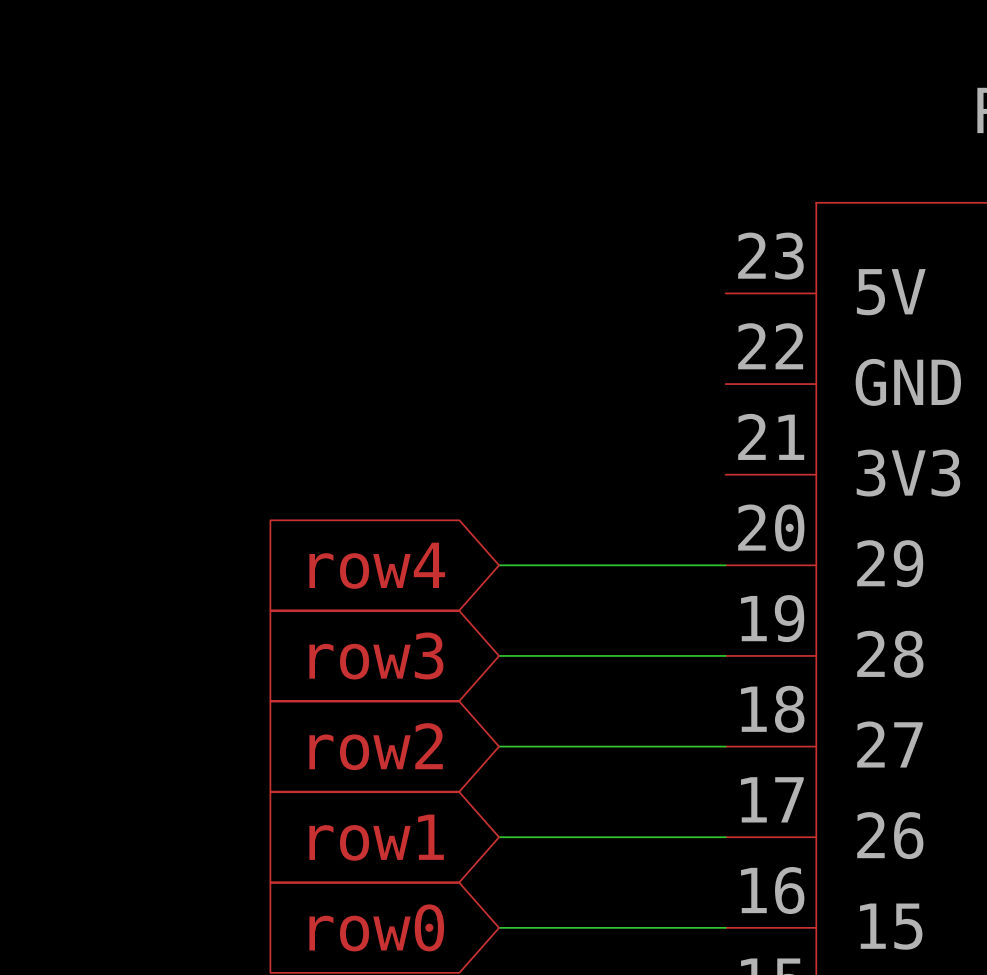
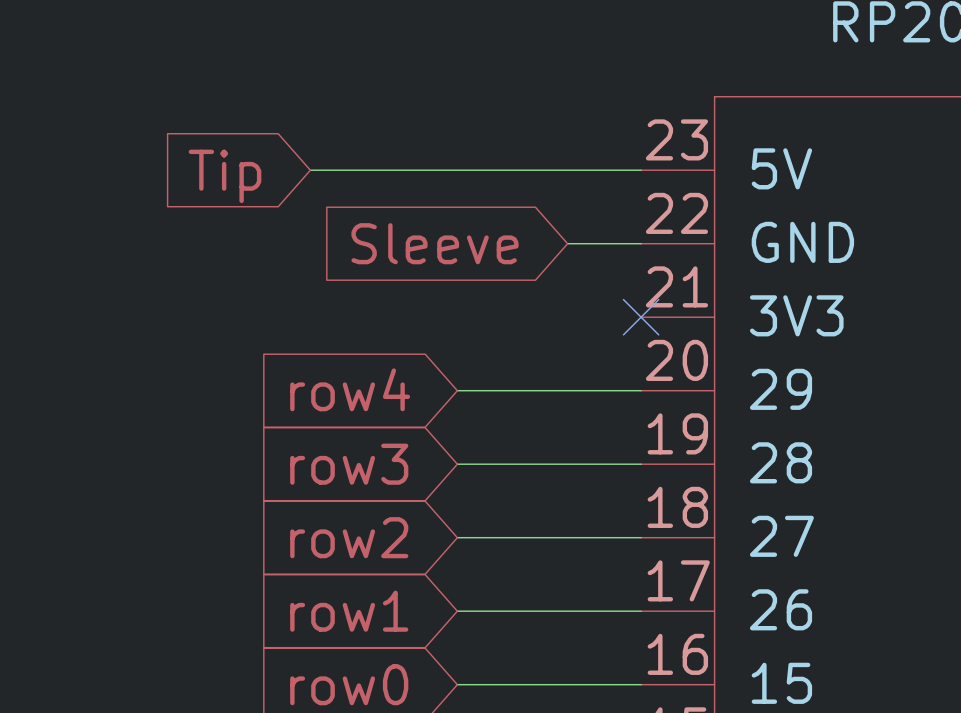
wire: none -> (310, 170) (641, 170)
global label: none -> Tip (225, 176)
global label: none -> Sleeve (434, 243)
wire: none -> (567, 243) (641, 243)
no-connect mark: none -> (641, 317)

